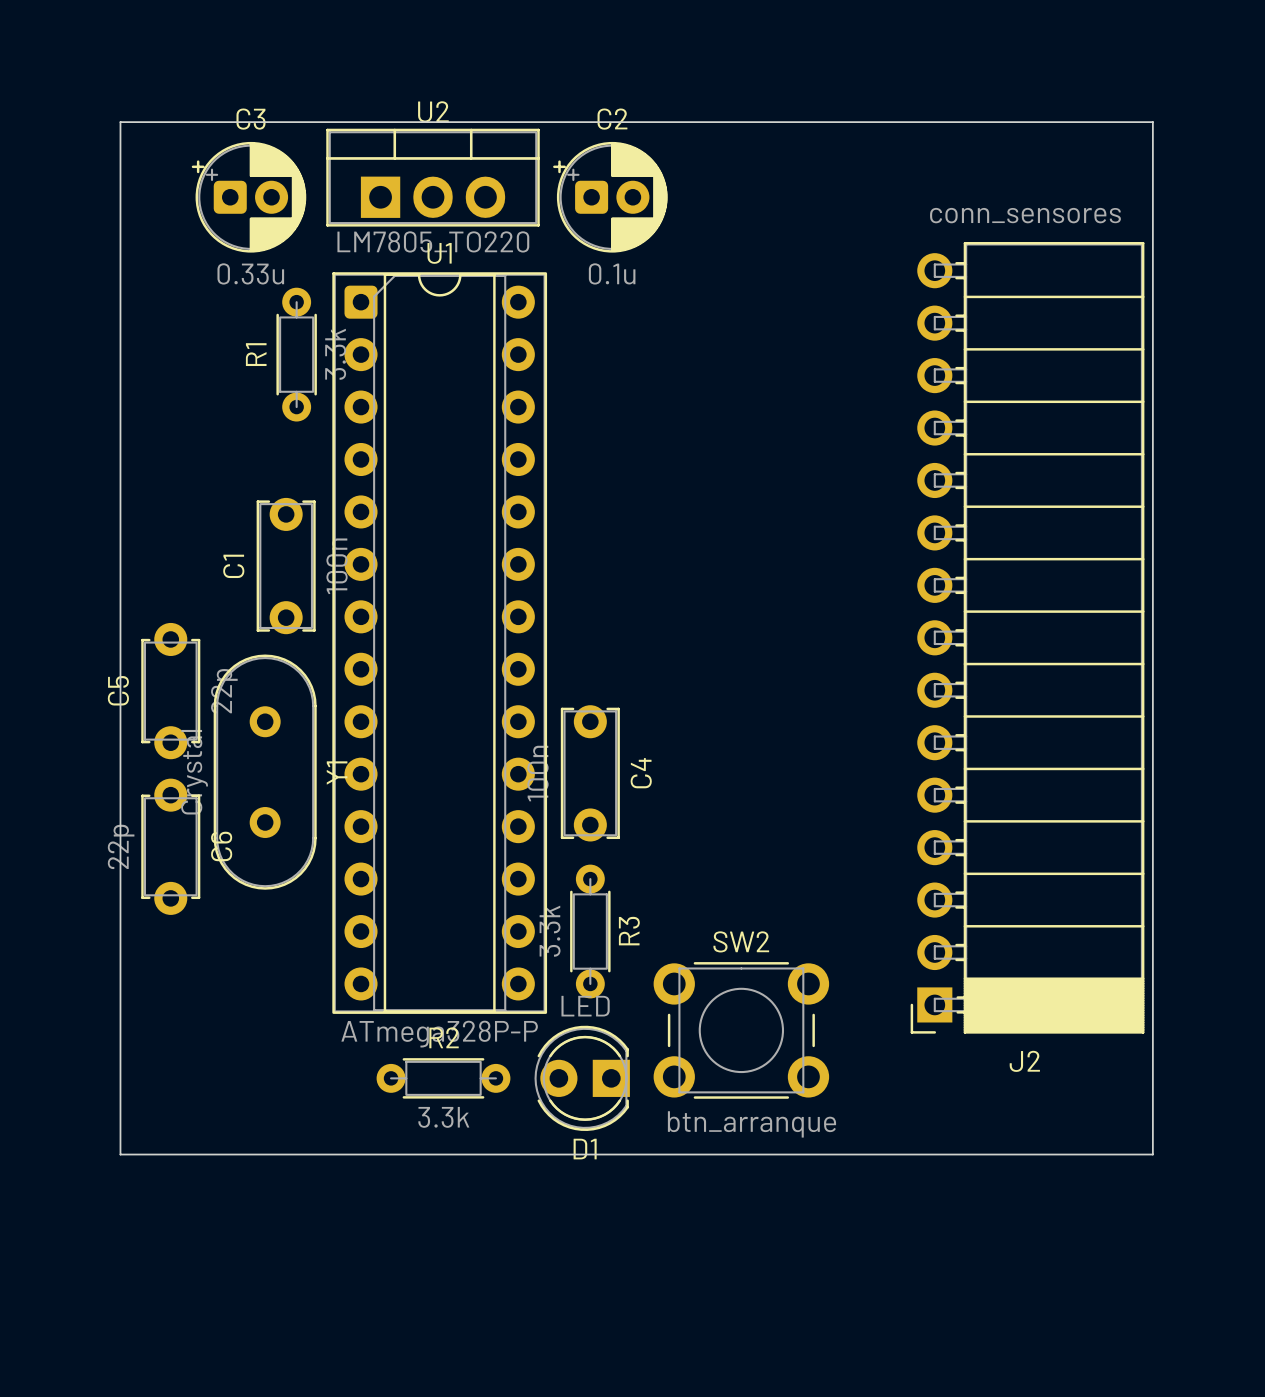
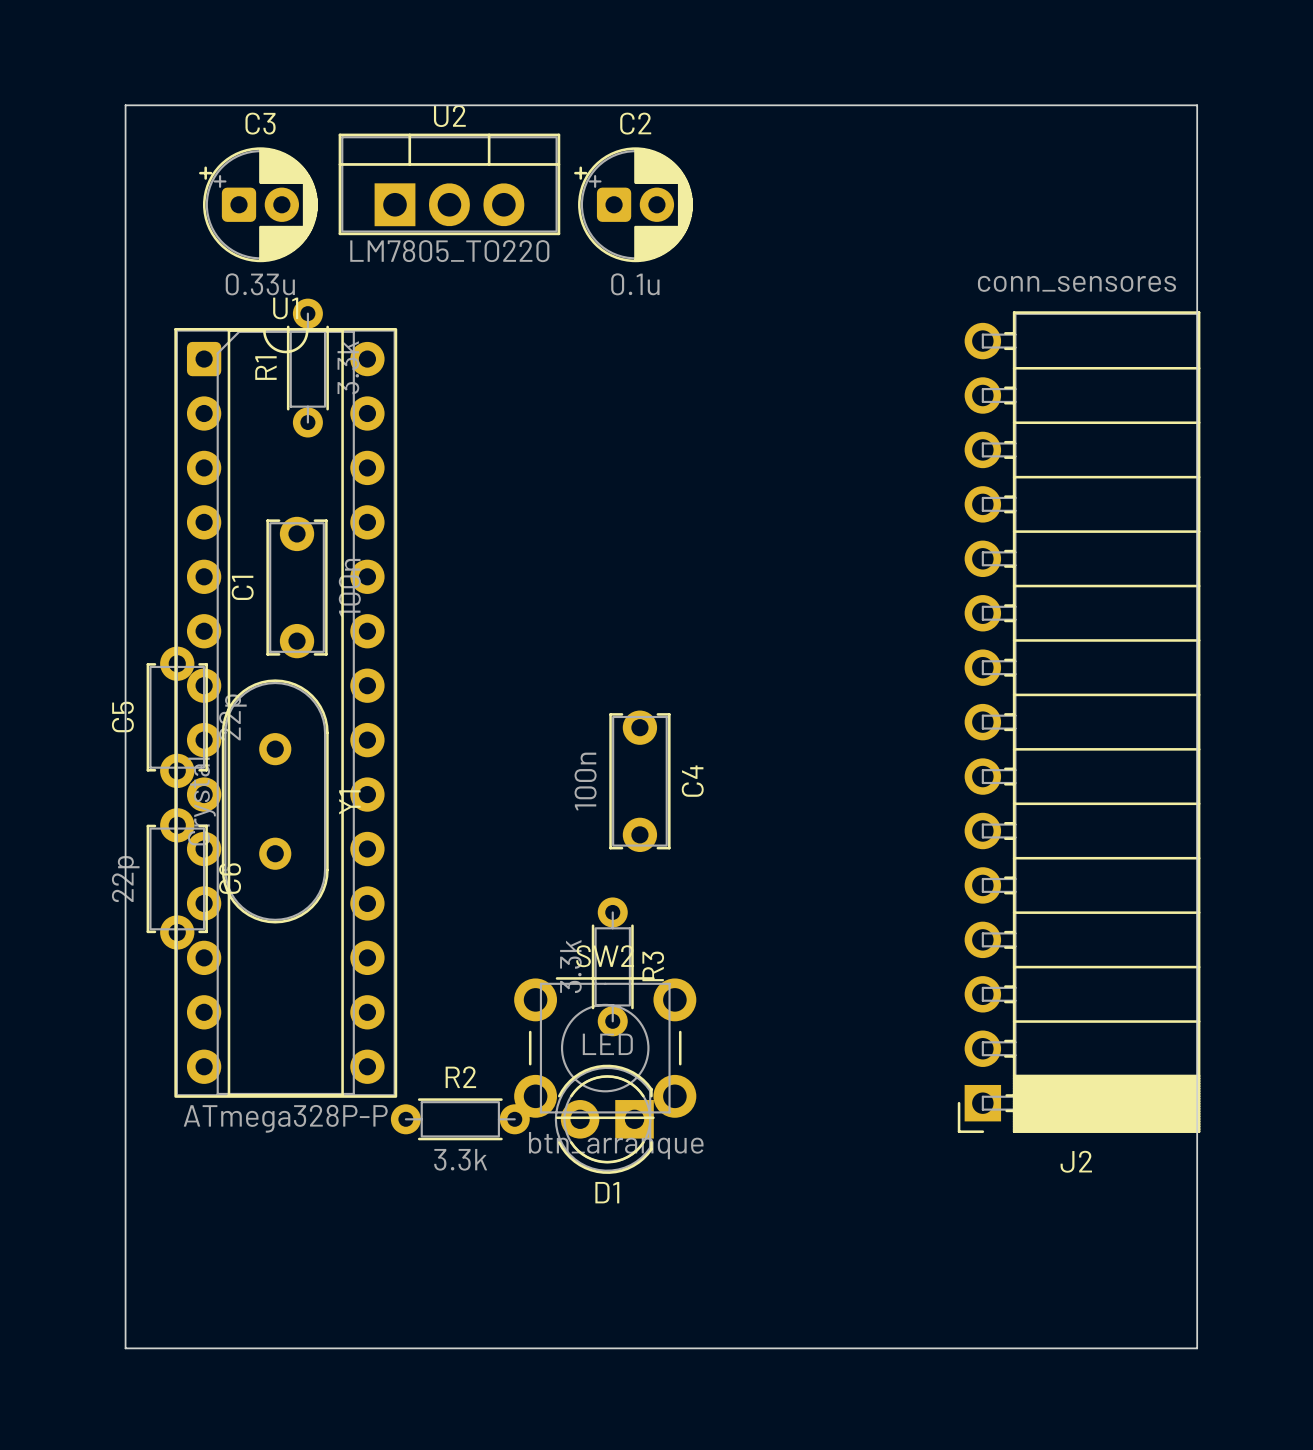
board edge: (120, 122) (1152, 122) (1152, 1154) (120, 1154) (120, 122) -> (125, 105) (125, 1348) (1197, 1348) (1197, 105) (125, 105)
J2 position: (1027, 637) -> (1079, 722)
U1 position: (439, 643) -> (285, 712)
C4 position: (590, 773) -> (639, 781)
SW2 position: (741, 1030) -> (605, 1048)

